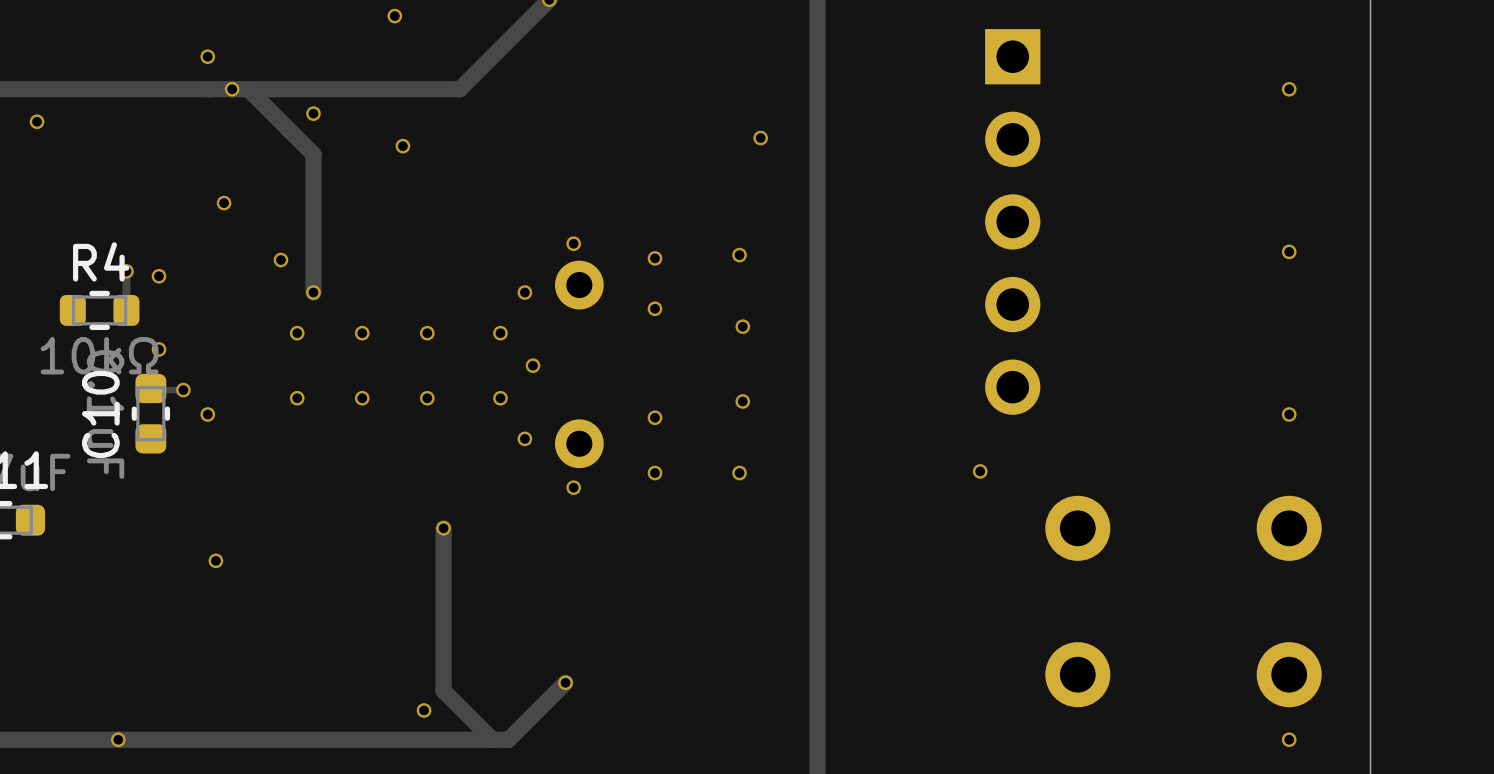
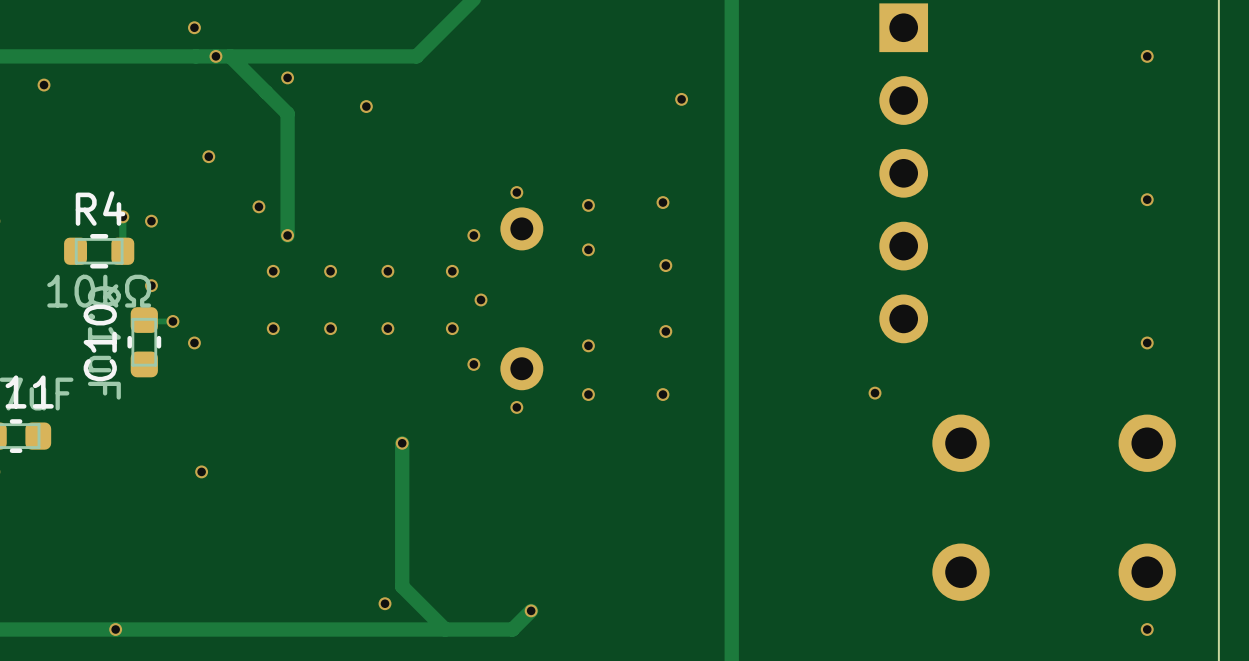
track: (565, 682) (508, 739) -> (531, 610) (512, 629) (459, 629)
via position: (565, 682) -> (531, 610)

